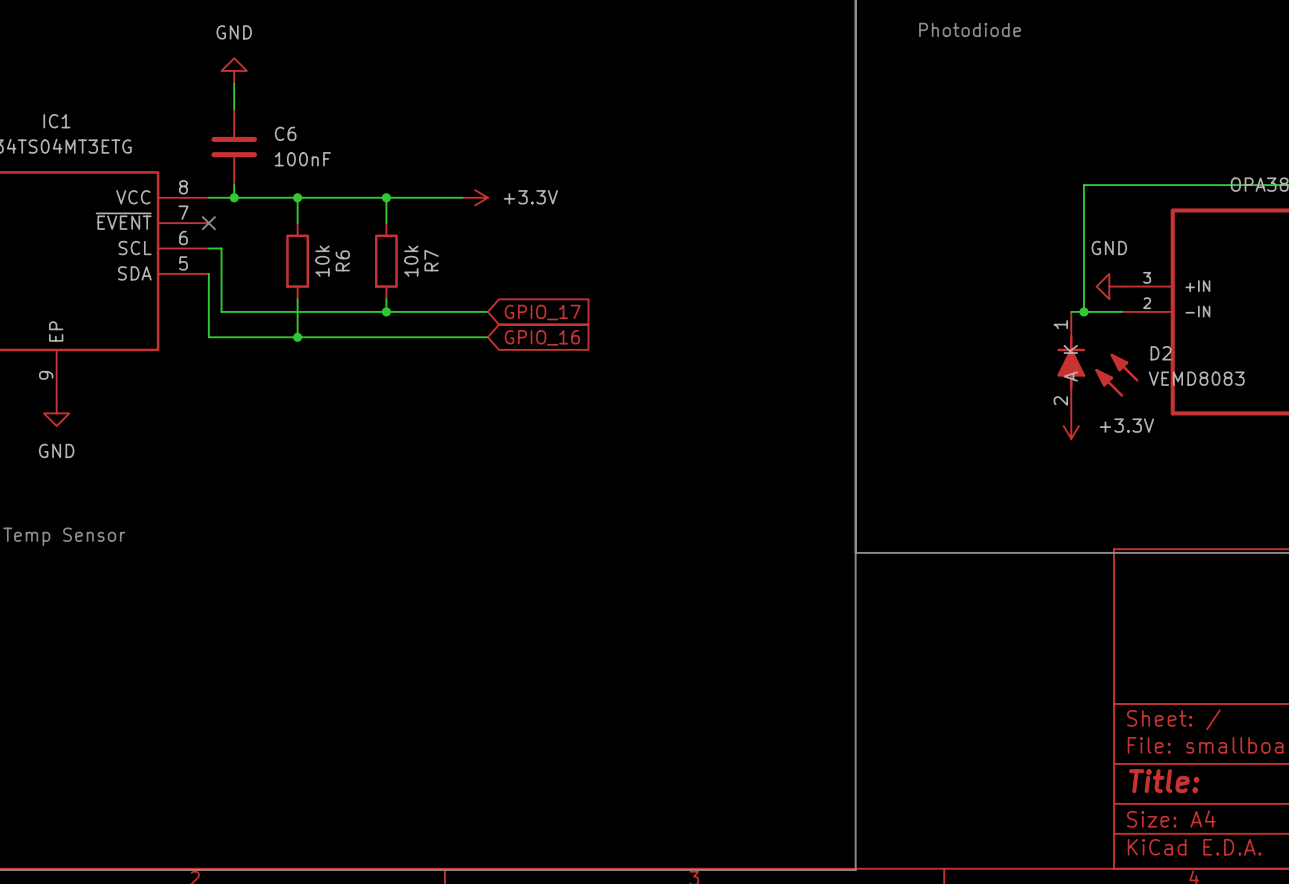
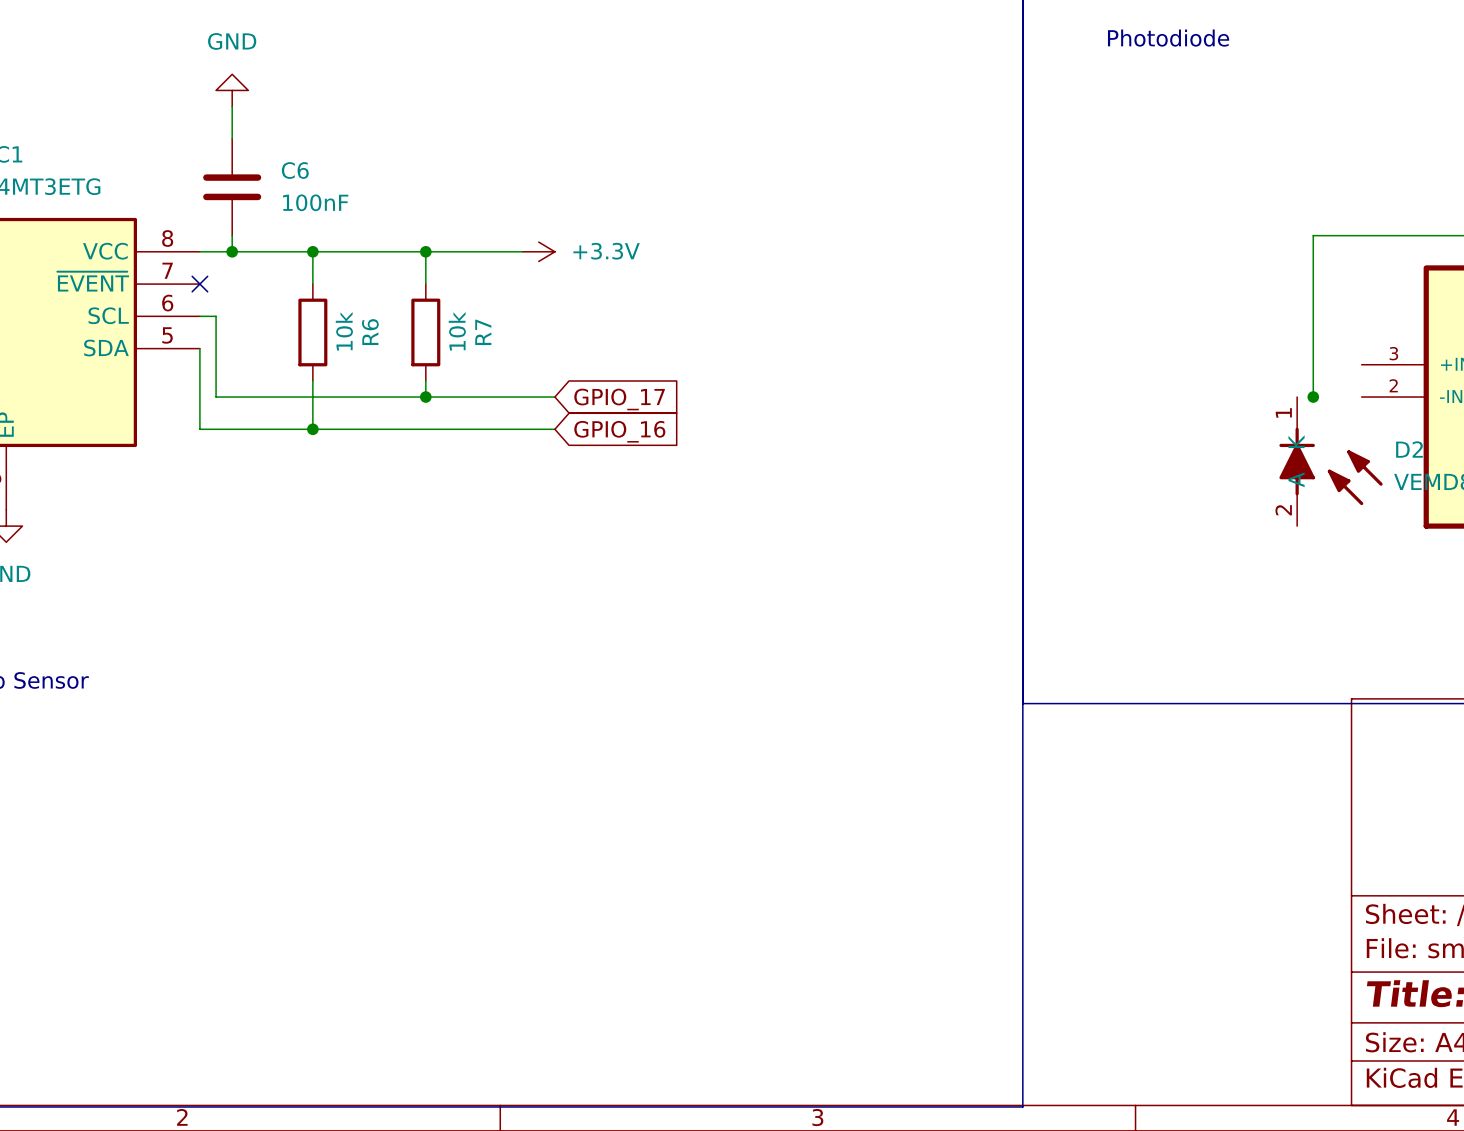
power symbol: GND (1109, 286) -> none
wire: (1071, 311) (1122, 311) -> none
power symbol: +3.3V (1071, 426) -> none

